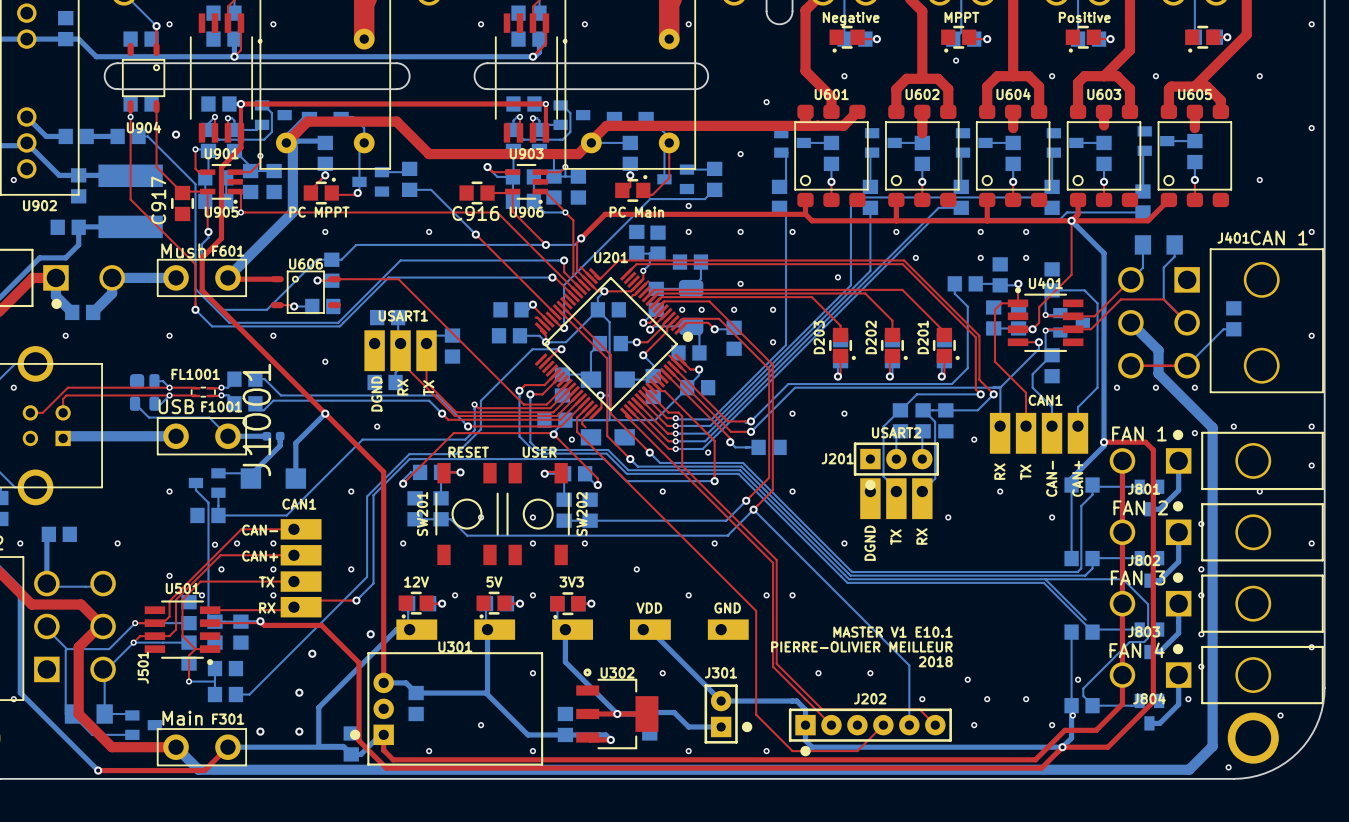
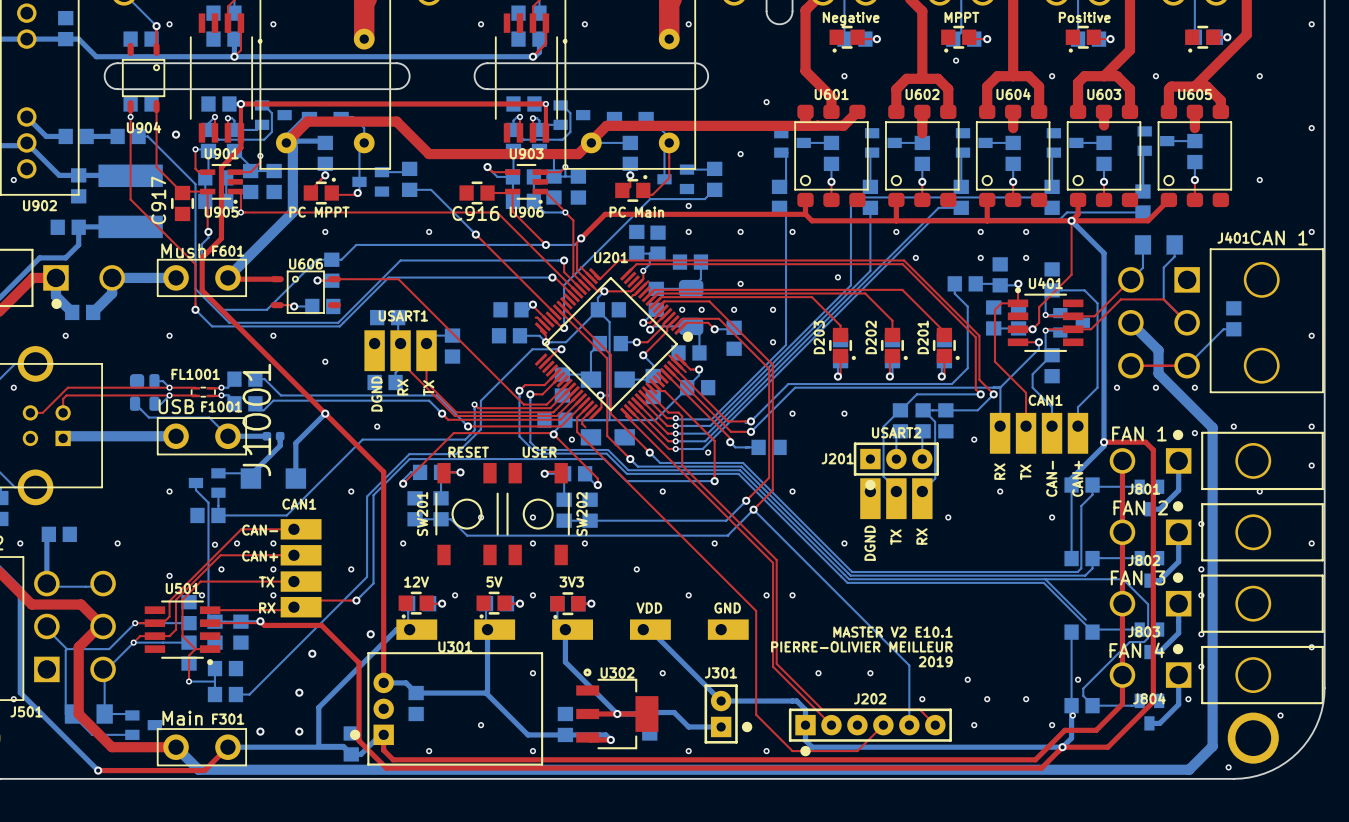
text: MASTER V1 E10.1 (892, 632) -> MASTER V2 E10.1 (892, 632)
text: 2018 (935, 661) -> 2019 (935, 661)
J501 name rotation: 0° (143, 667) -> 90° clockwise (26, 711)
J501 name position: J501 (143, 667) -> J501 (26, 711)

